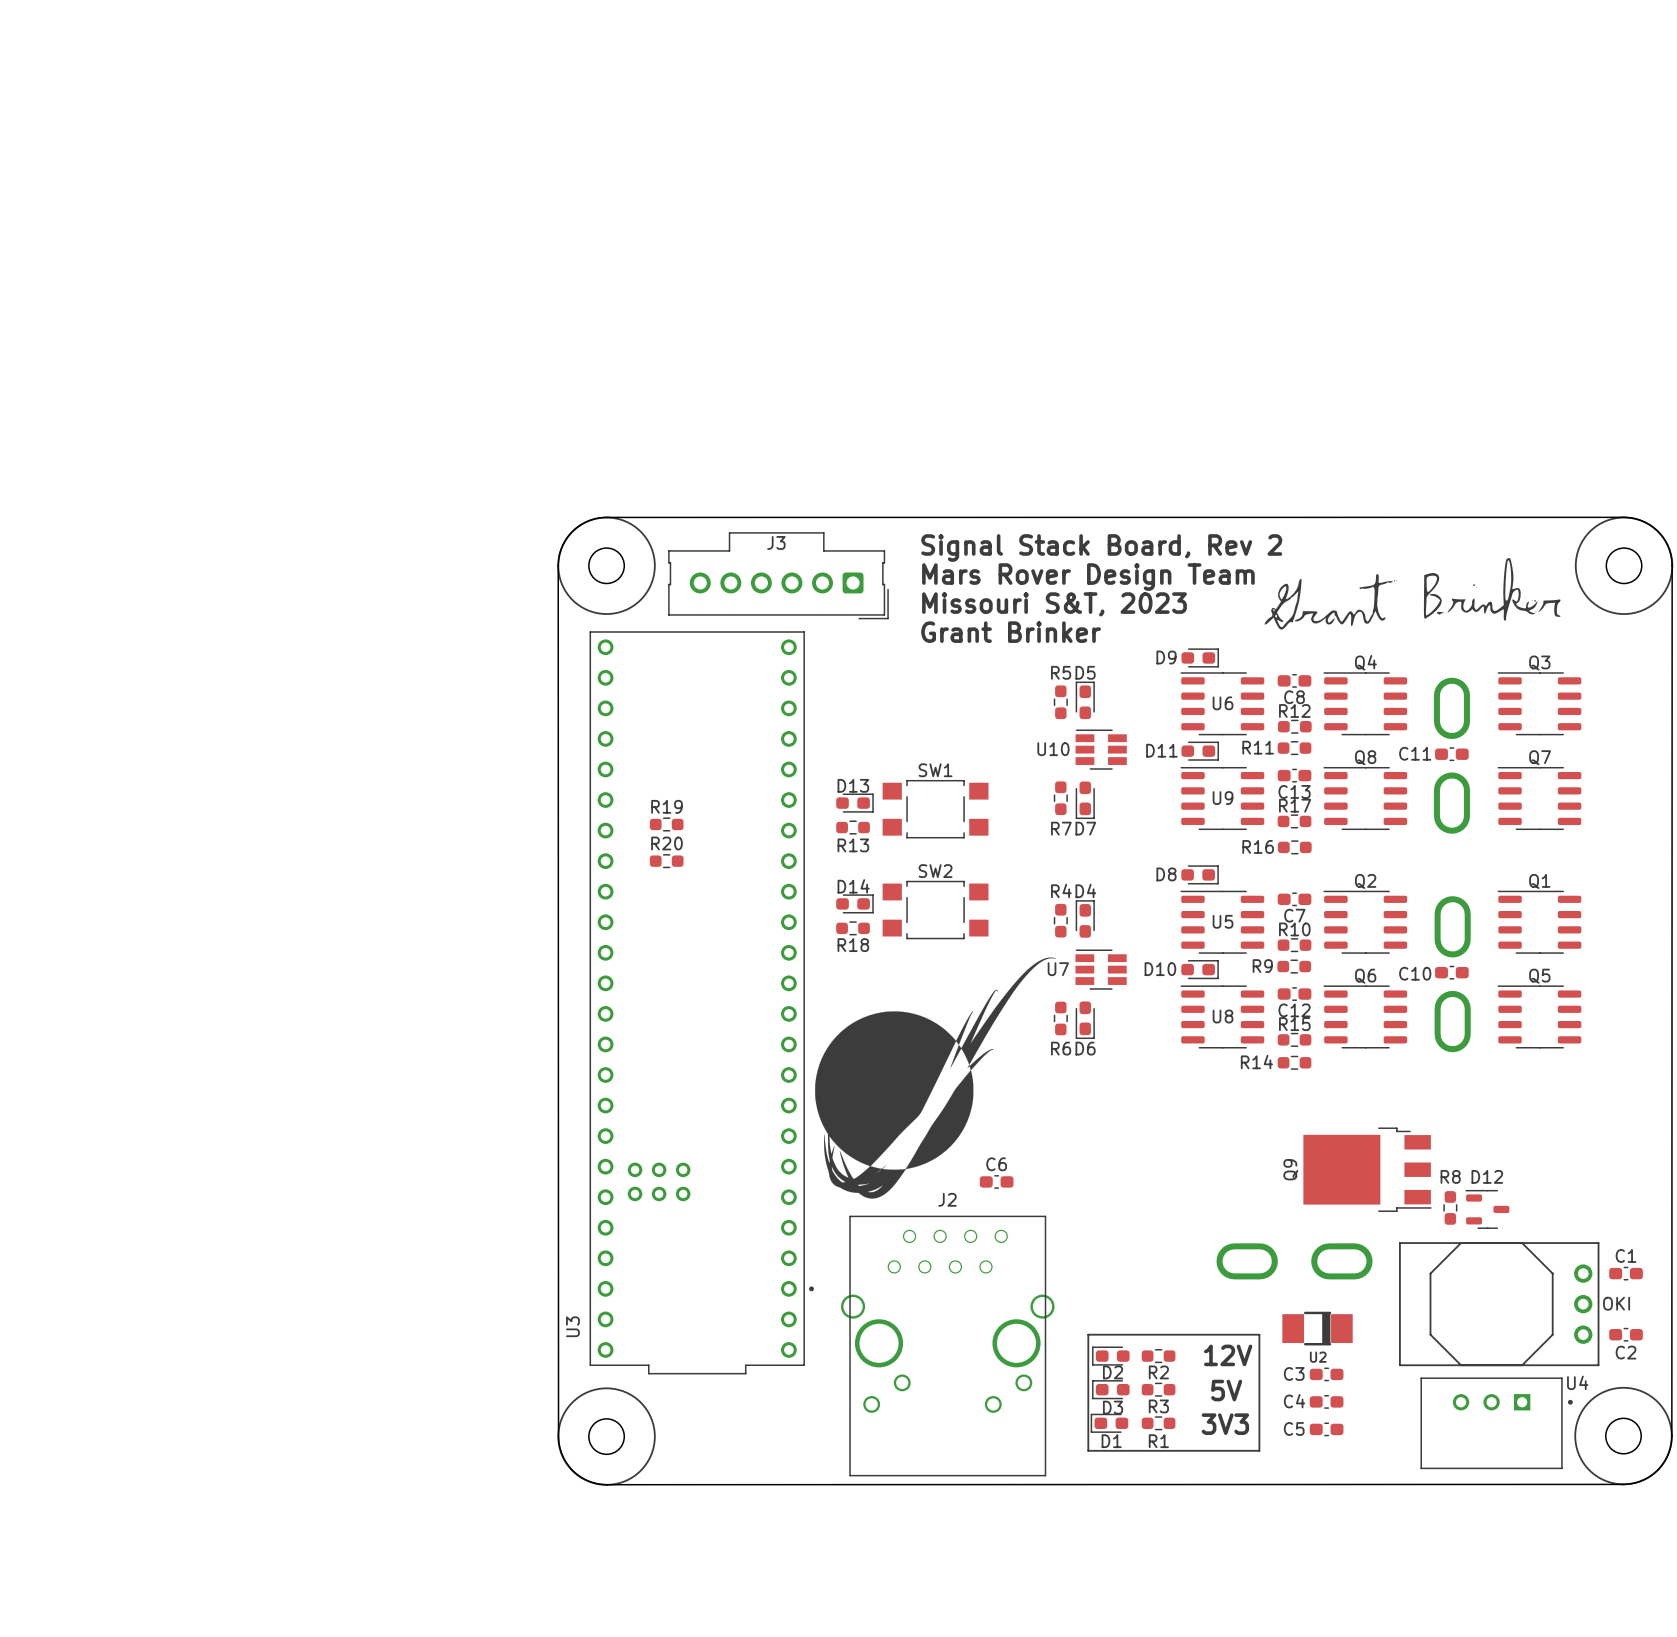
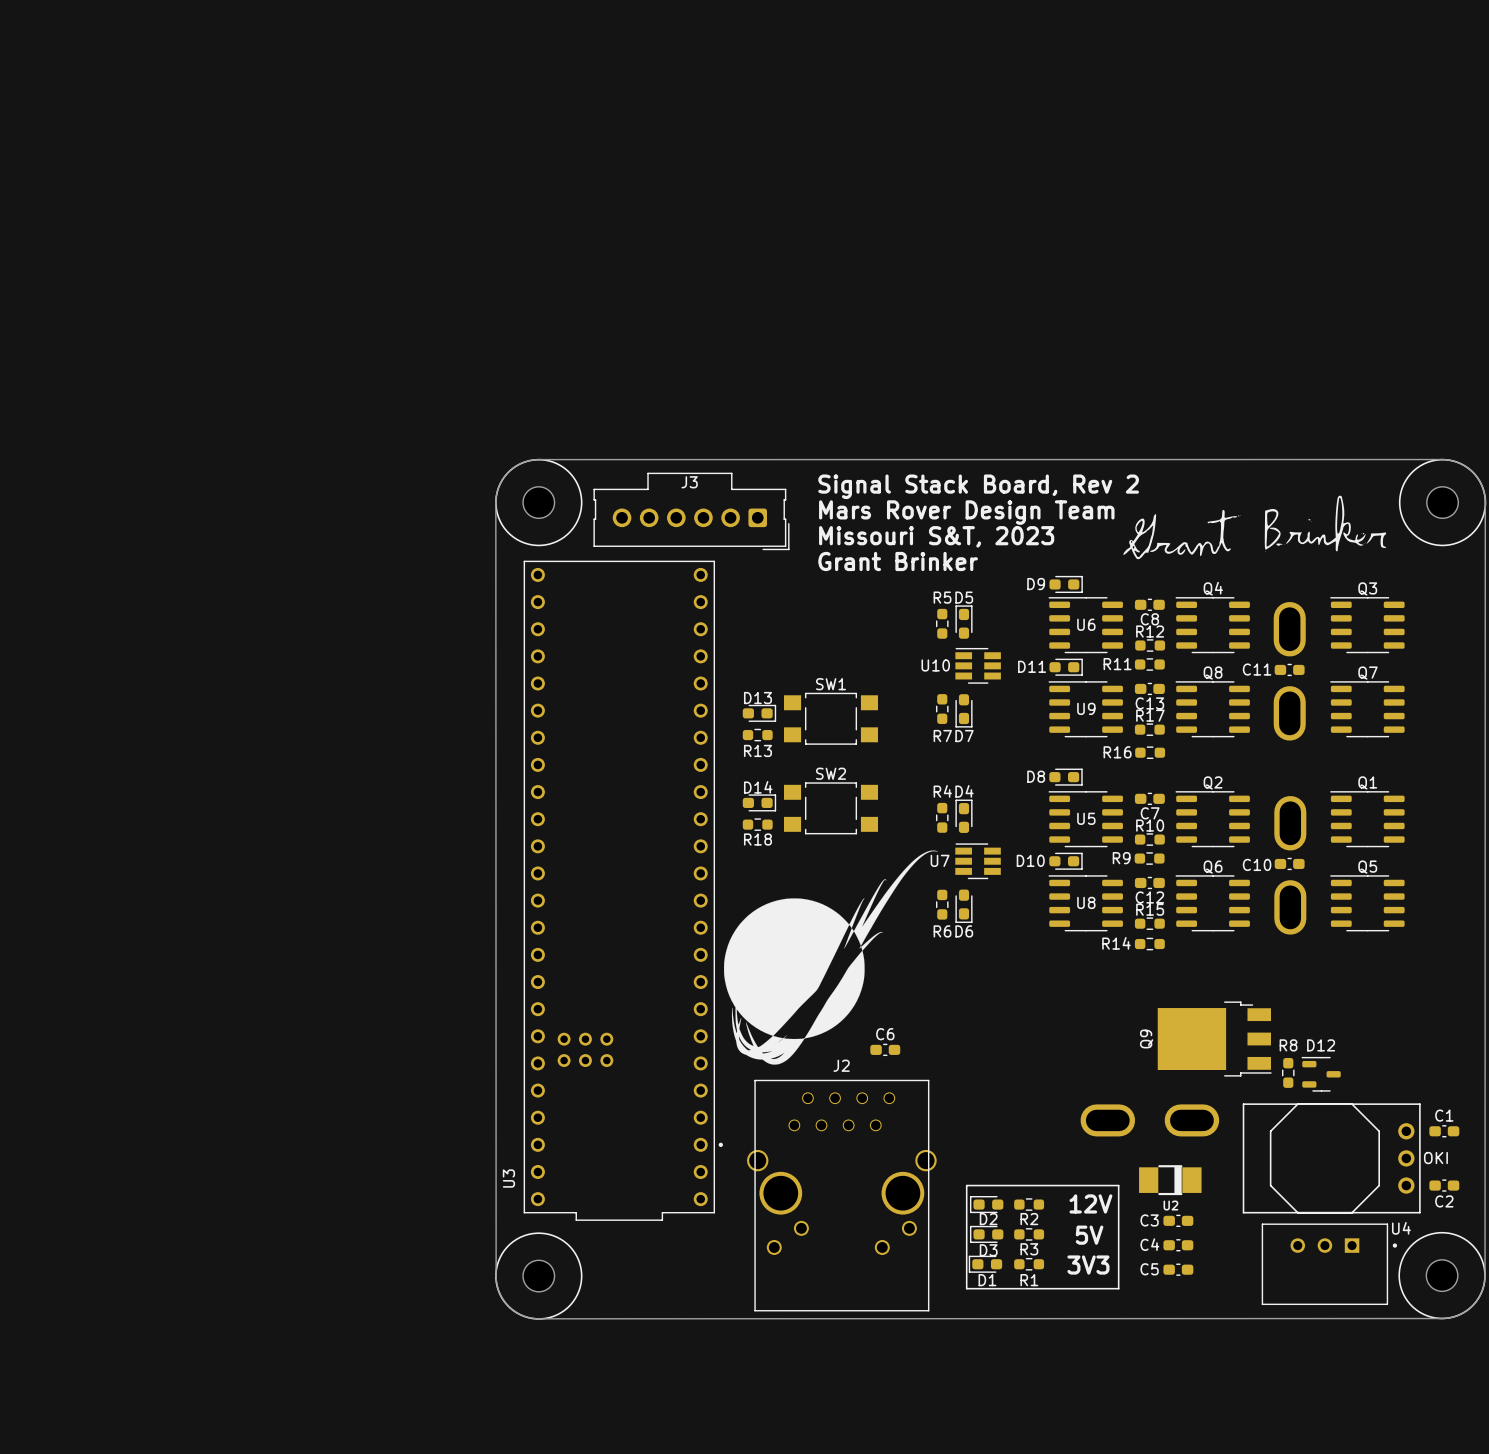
R19: (666, 824) -> none
R20: (666, 861) -> none

